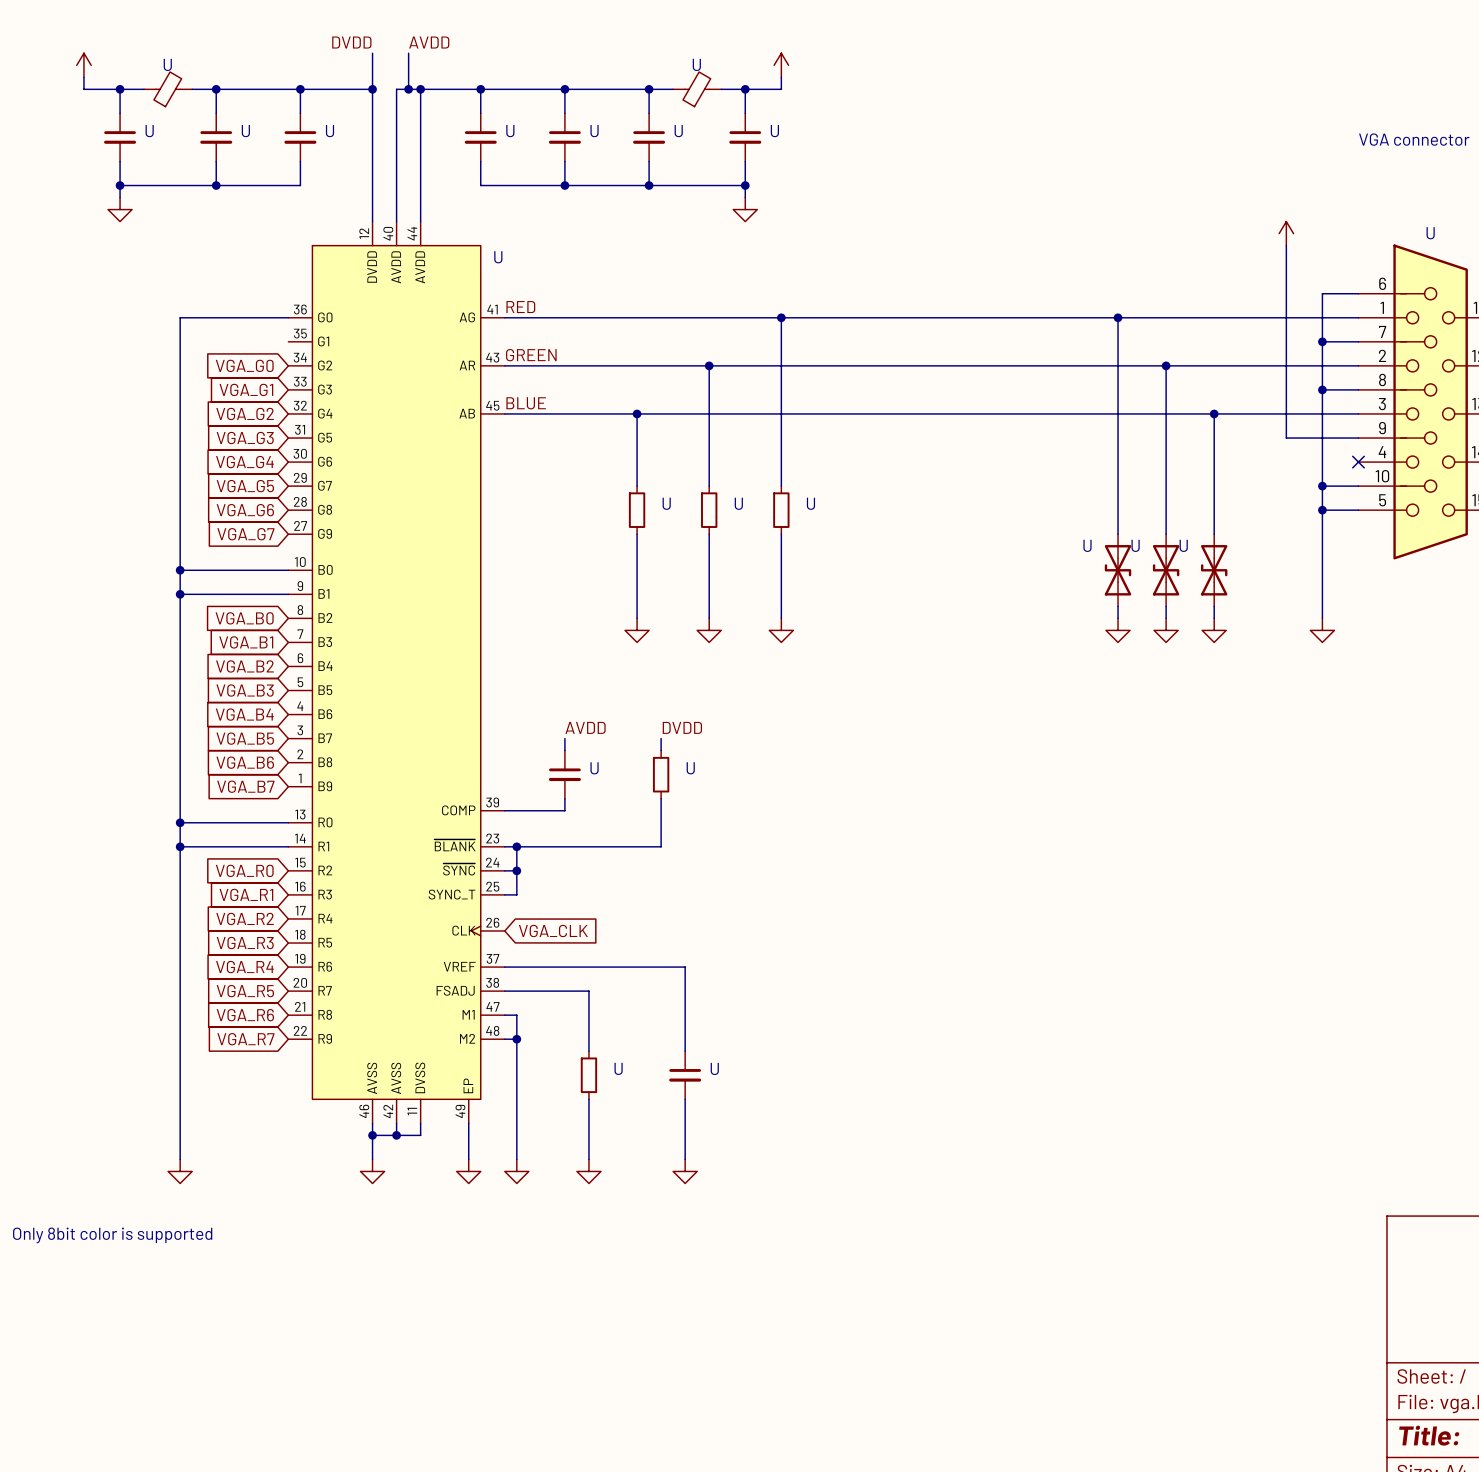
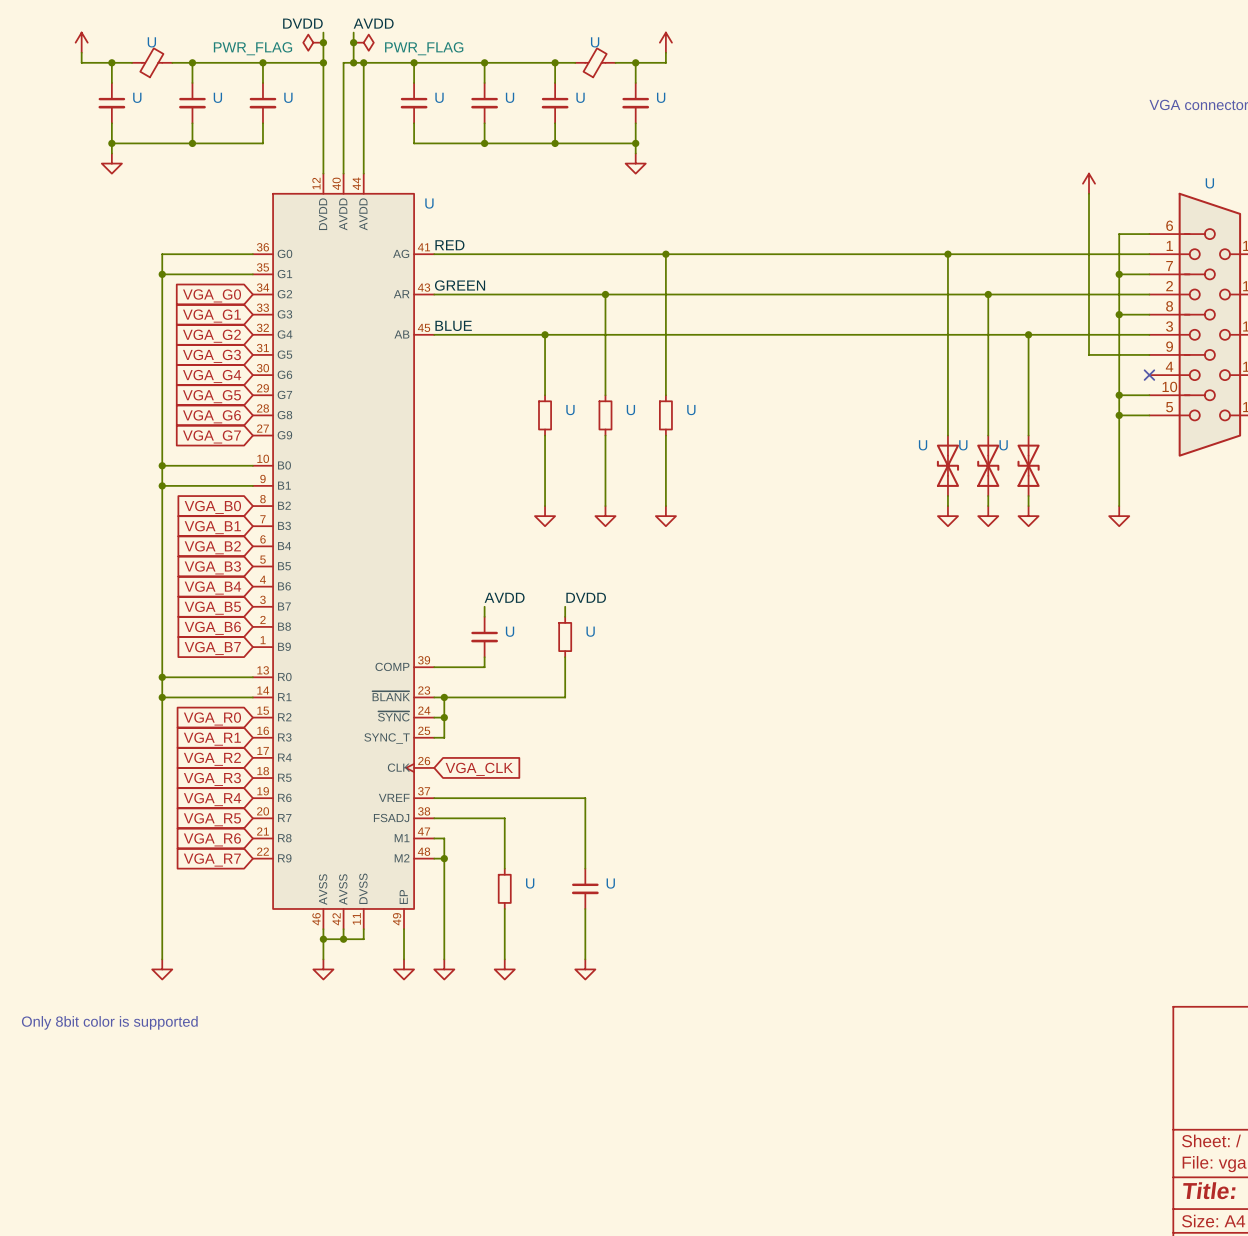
power symbol: none -> PWR_FLAG (313, 42)
junction: none -> (323, 42)
junction: none -> (353, 42)
power symbol: none -> PWR_FLAG (363, 42)
wire: none -> (162, 274) (252, 274)
junction: none -> (162, 274)

